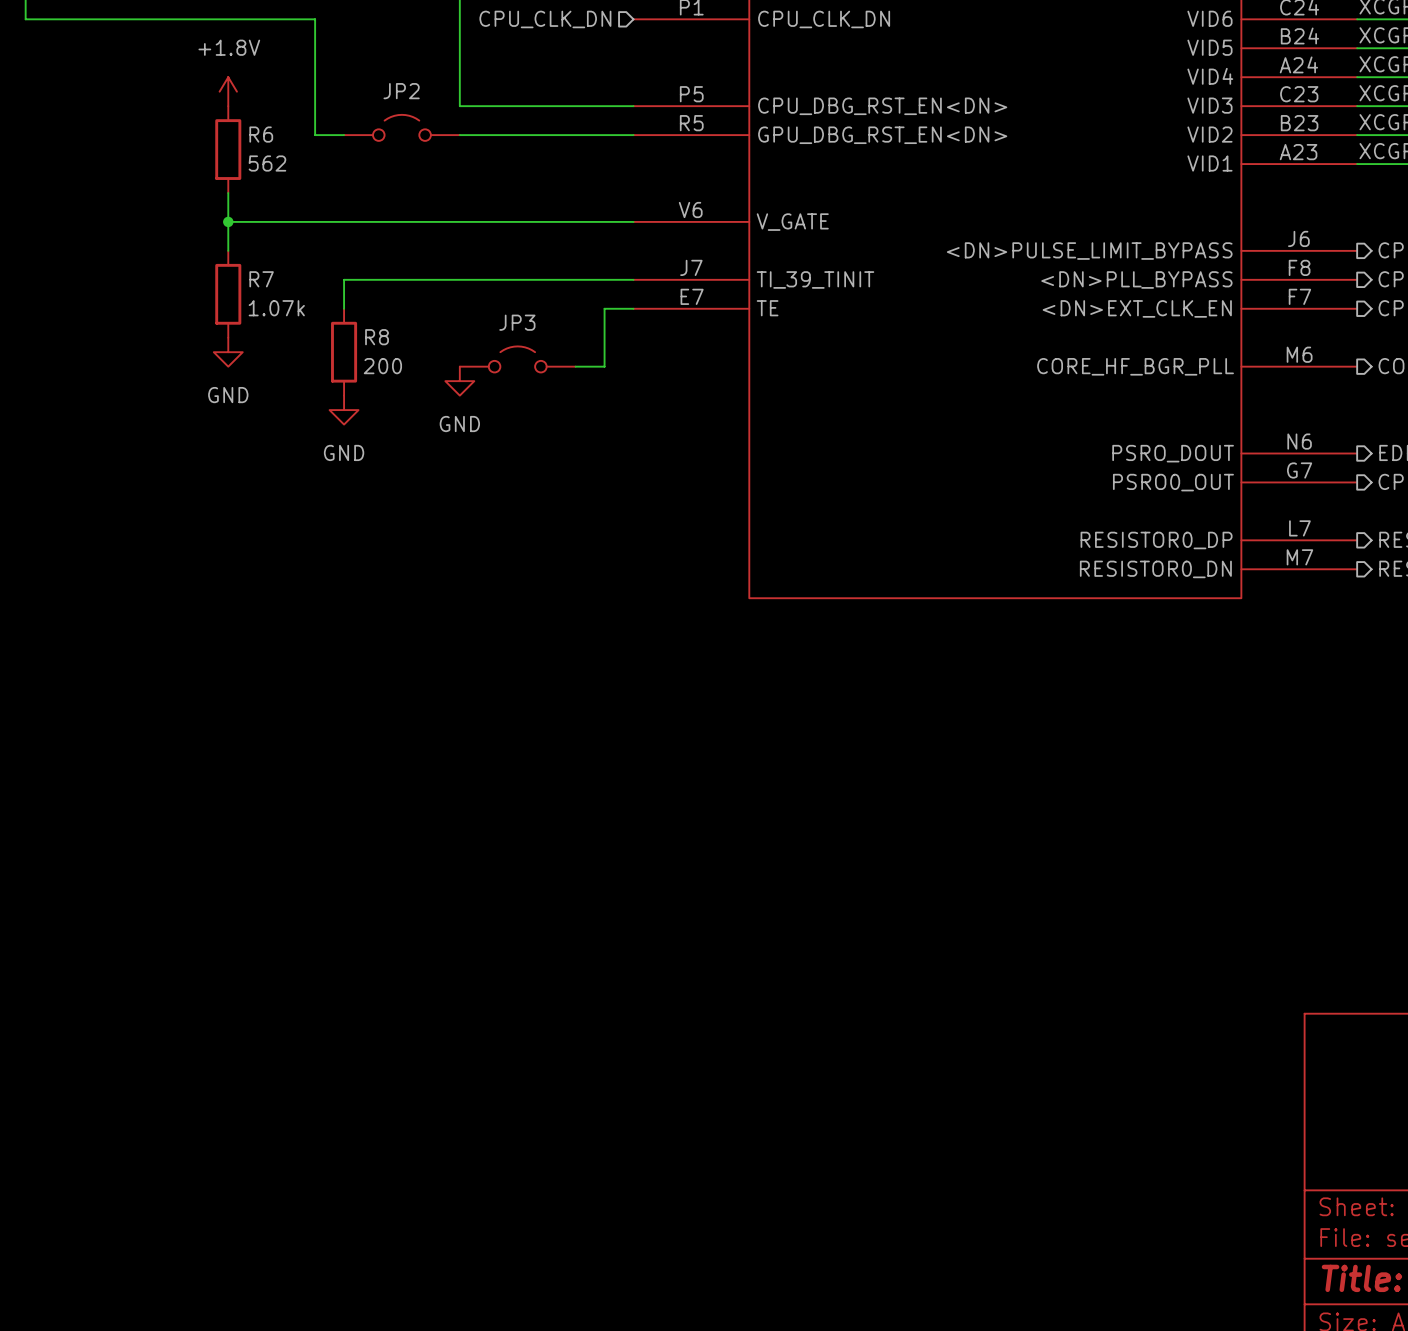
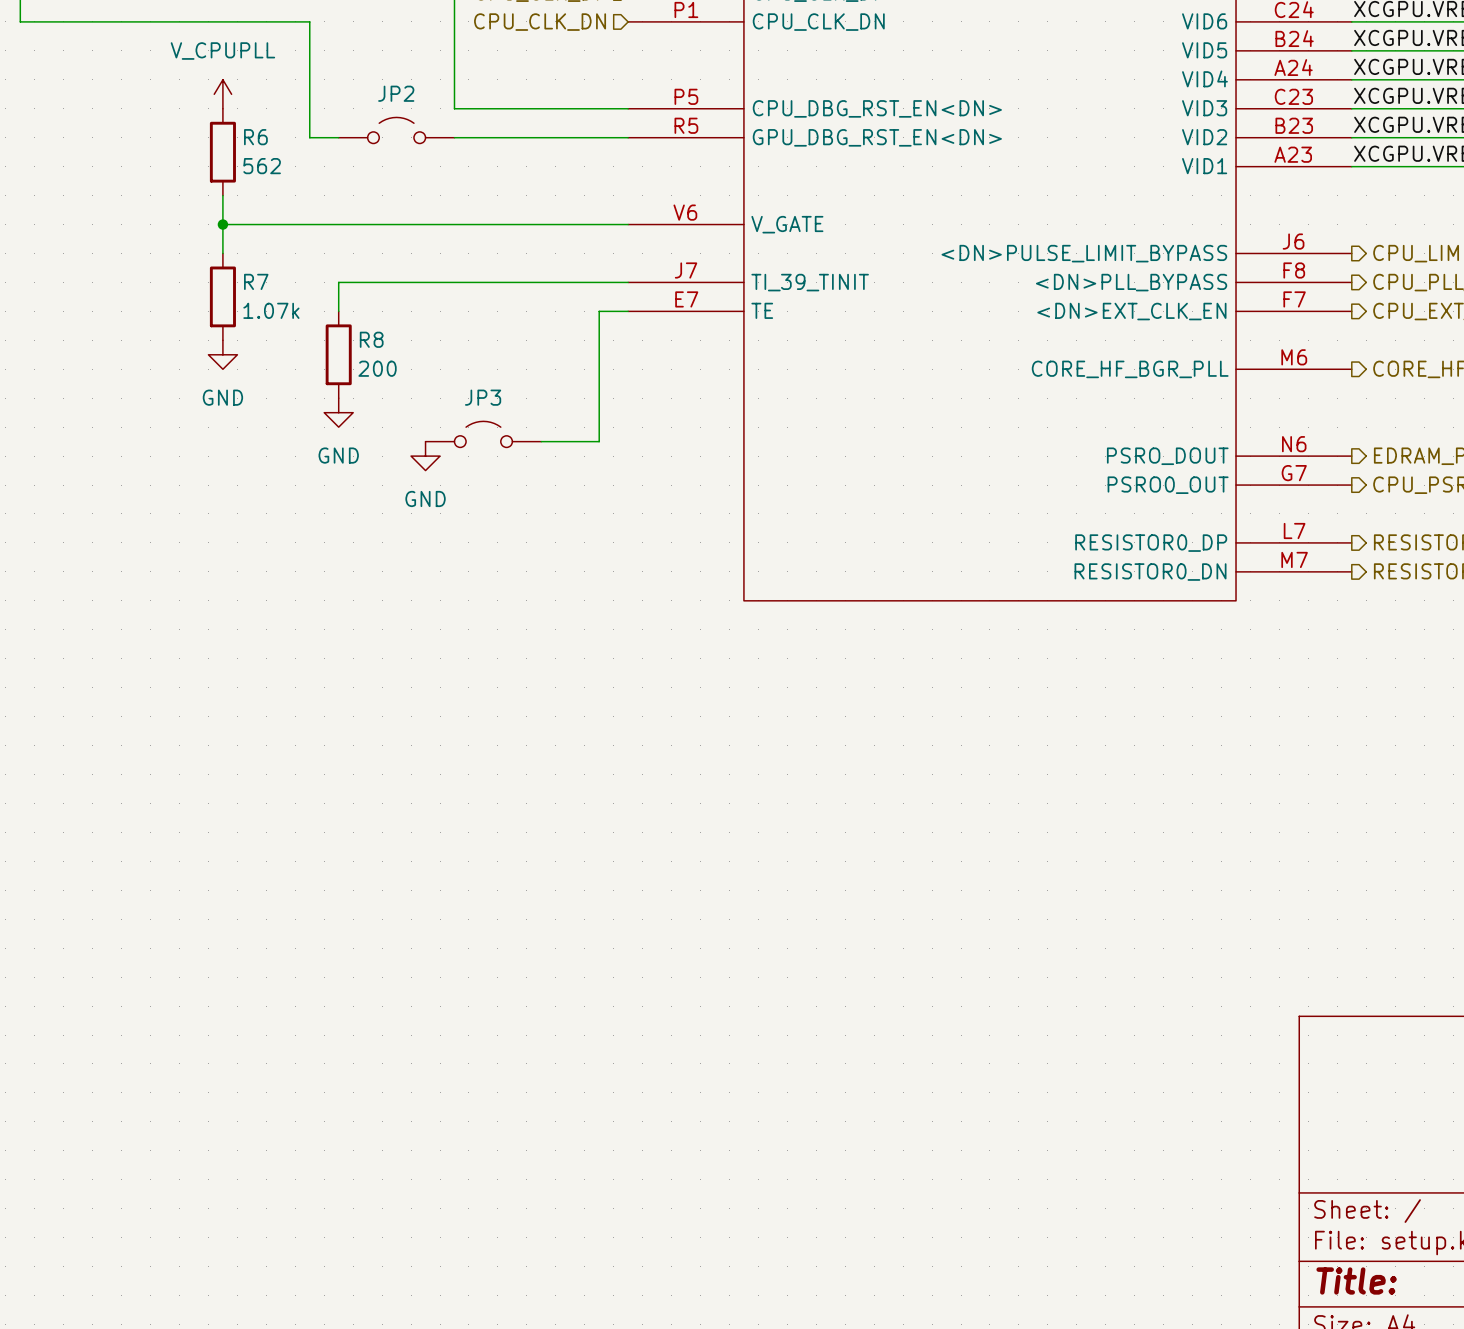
power symbol: +1.8V (228, 91) -> V_CPUPLL (222, 94)
JP3 position: (517, 359) -> (483, 434)
wire: (575, 366) (604, 366) -> (541, 441) (599, 441) (599, 369)
power symbol position: GND (459, 381) -> GND (425, 456)

